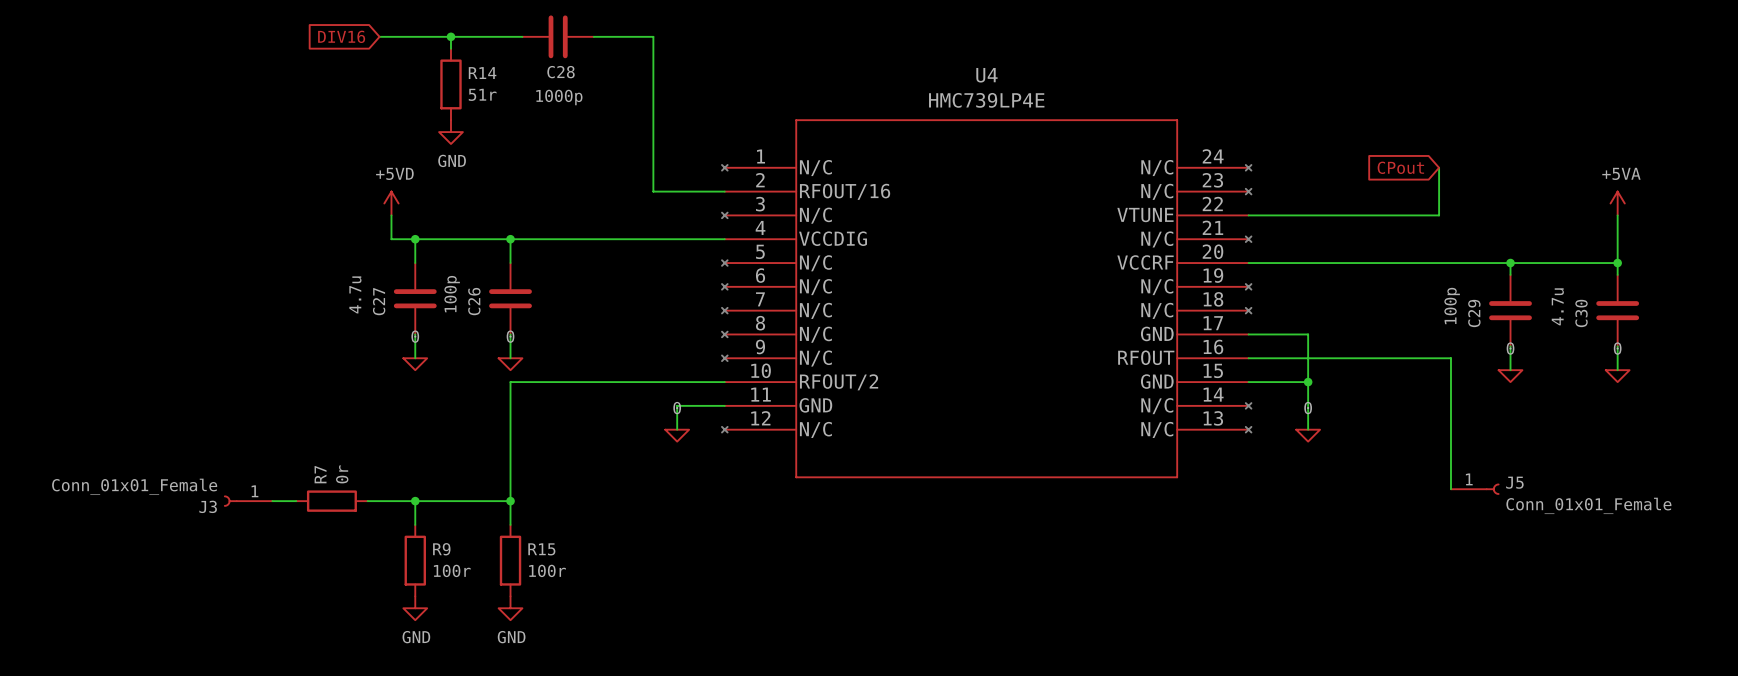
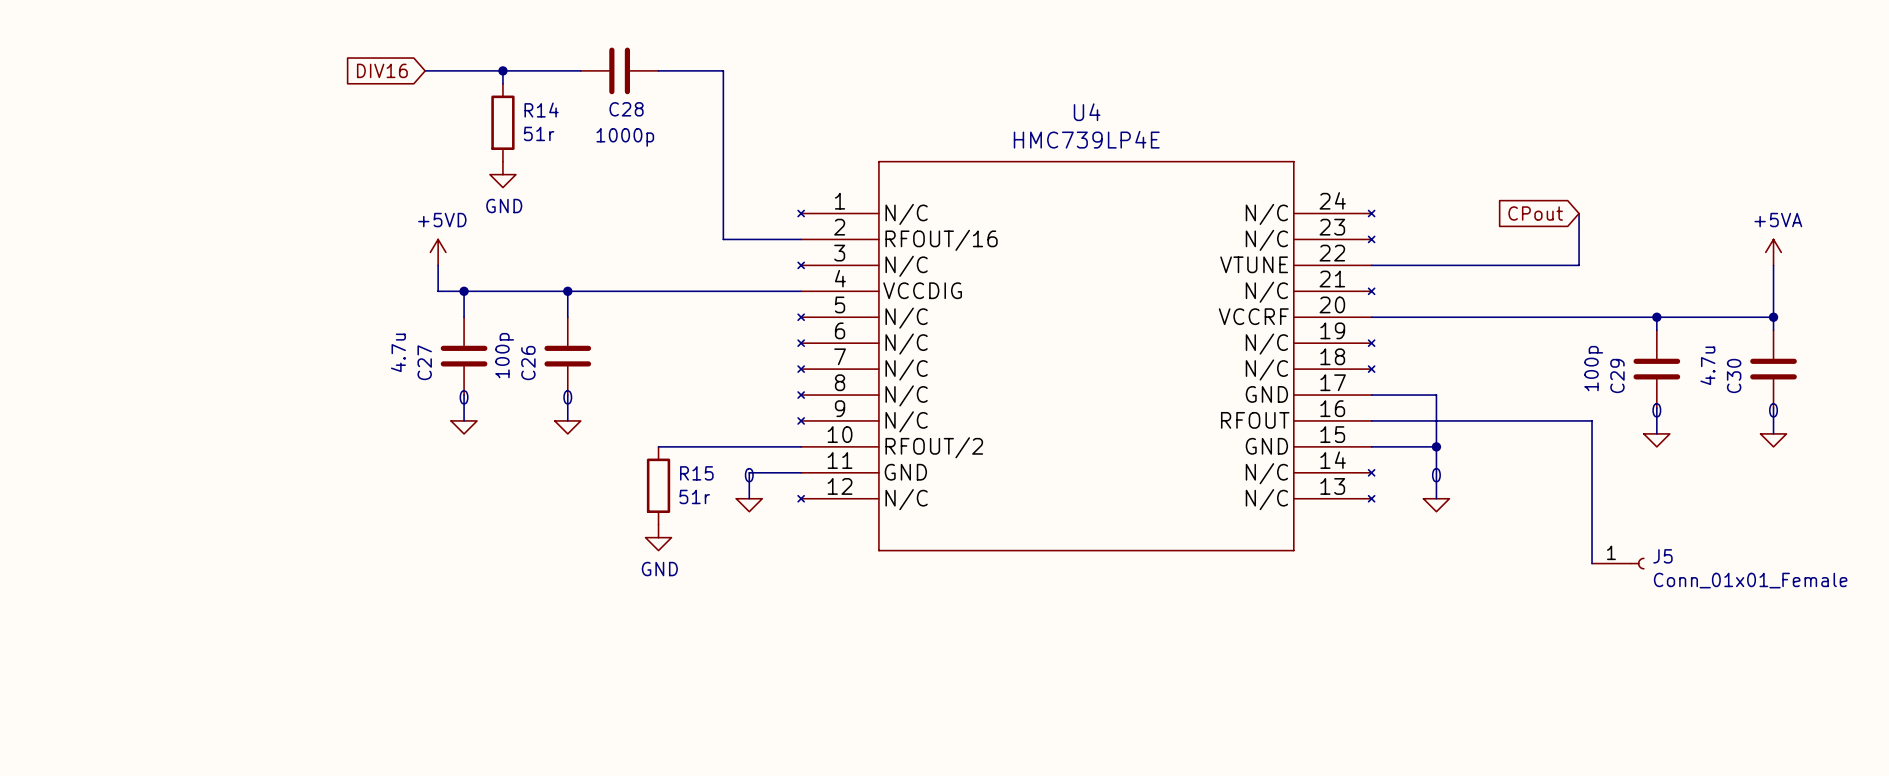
wire: (593, 382) (510, 382) (510, 524) -> none
power symbol: none -> GND (658, 537)
J3: Conn_01x01_Female (248, 501) -> none
wire: (272, 501) (296, 501) -> none
R7: 0r (331, 501) -> none
wire: (367, 501) (510, 501) -> none
wire: (415, 501) (415, 524) -> none
junction: (415, 501) -> none
junction: (510, 501) -> none
R9: 100r (415, 560) -> none
R15 position: (510, 560) -> (658, 485)
R15 value: 100r (547, 570) -> 51r (694, 496)
power symbol: GND (415, 608) -> none
power symbol: GND (510, 608) -> none

